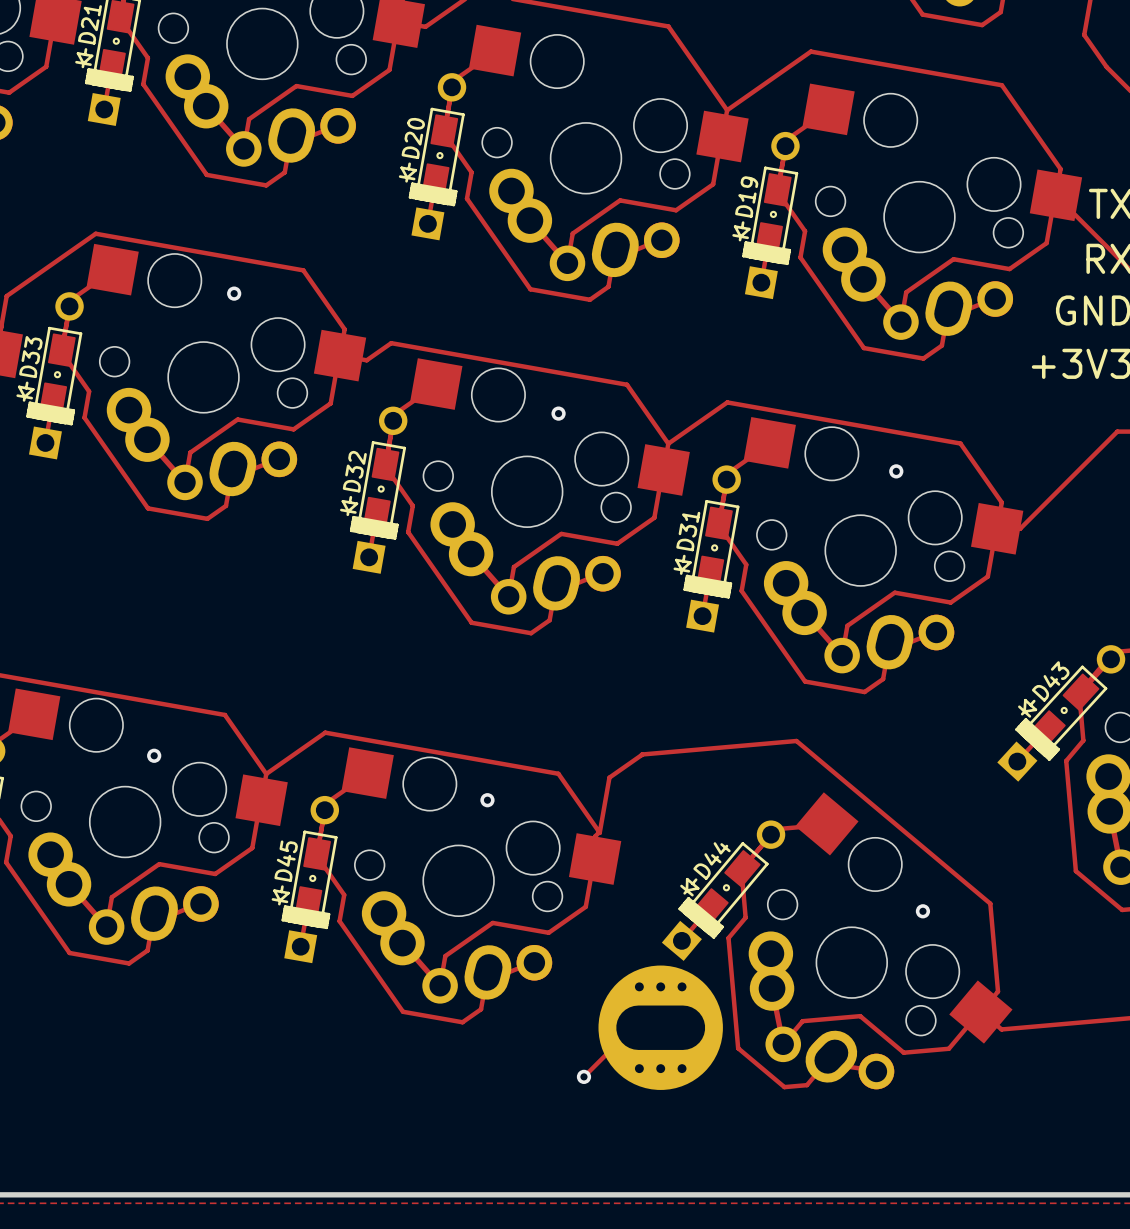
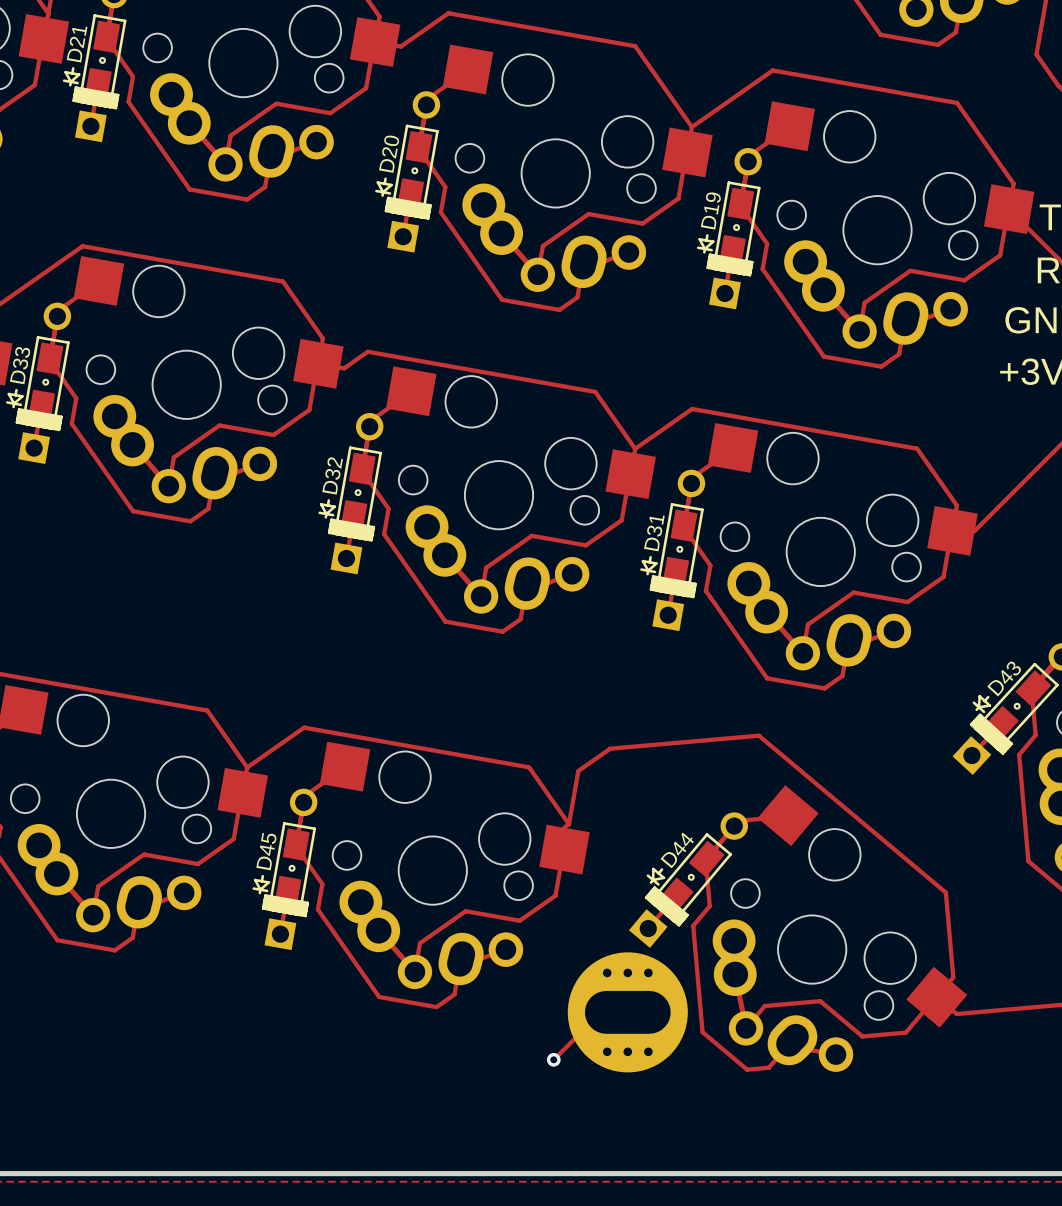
via: (234, 293) -> none
via: (558, 413) -> none
via: (896, 471) -> none
via: (154, 755) -> none
via: (487, 800) -> none
via: (922, 911) -> none

